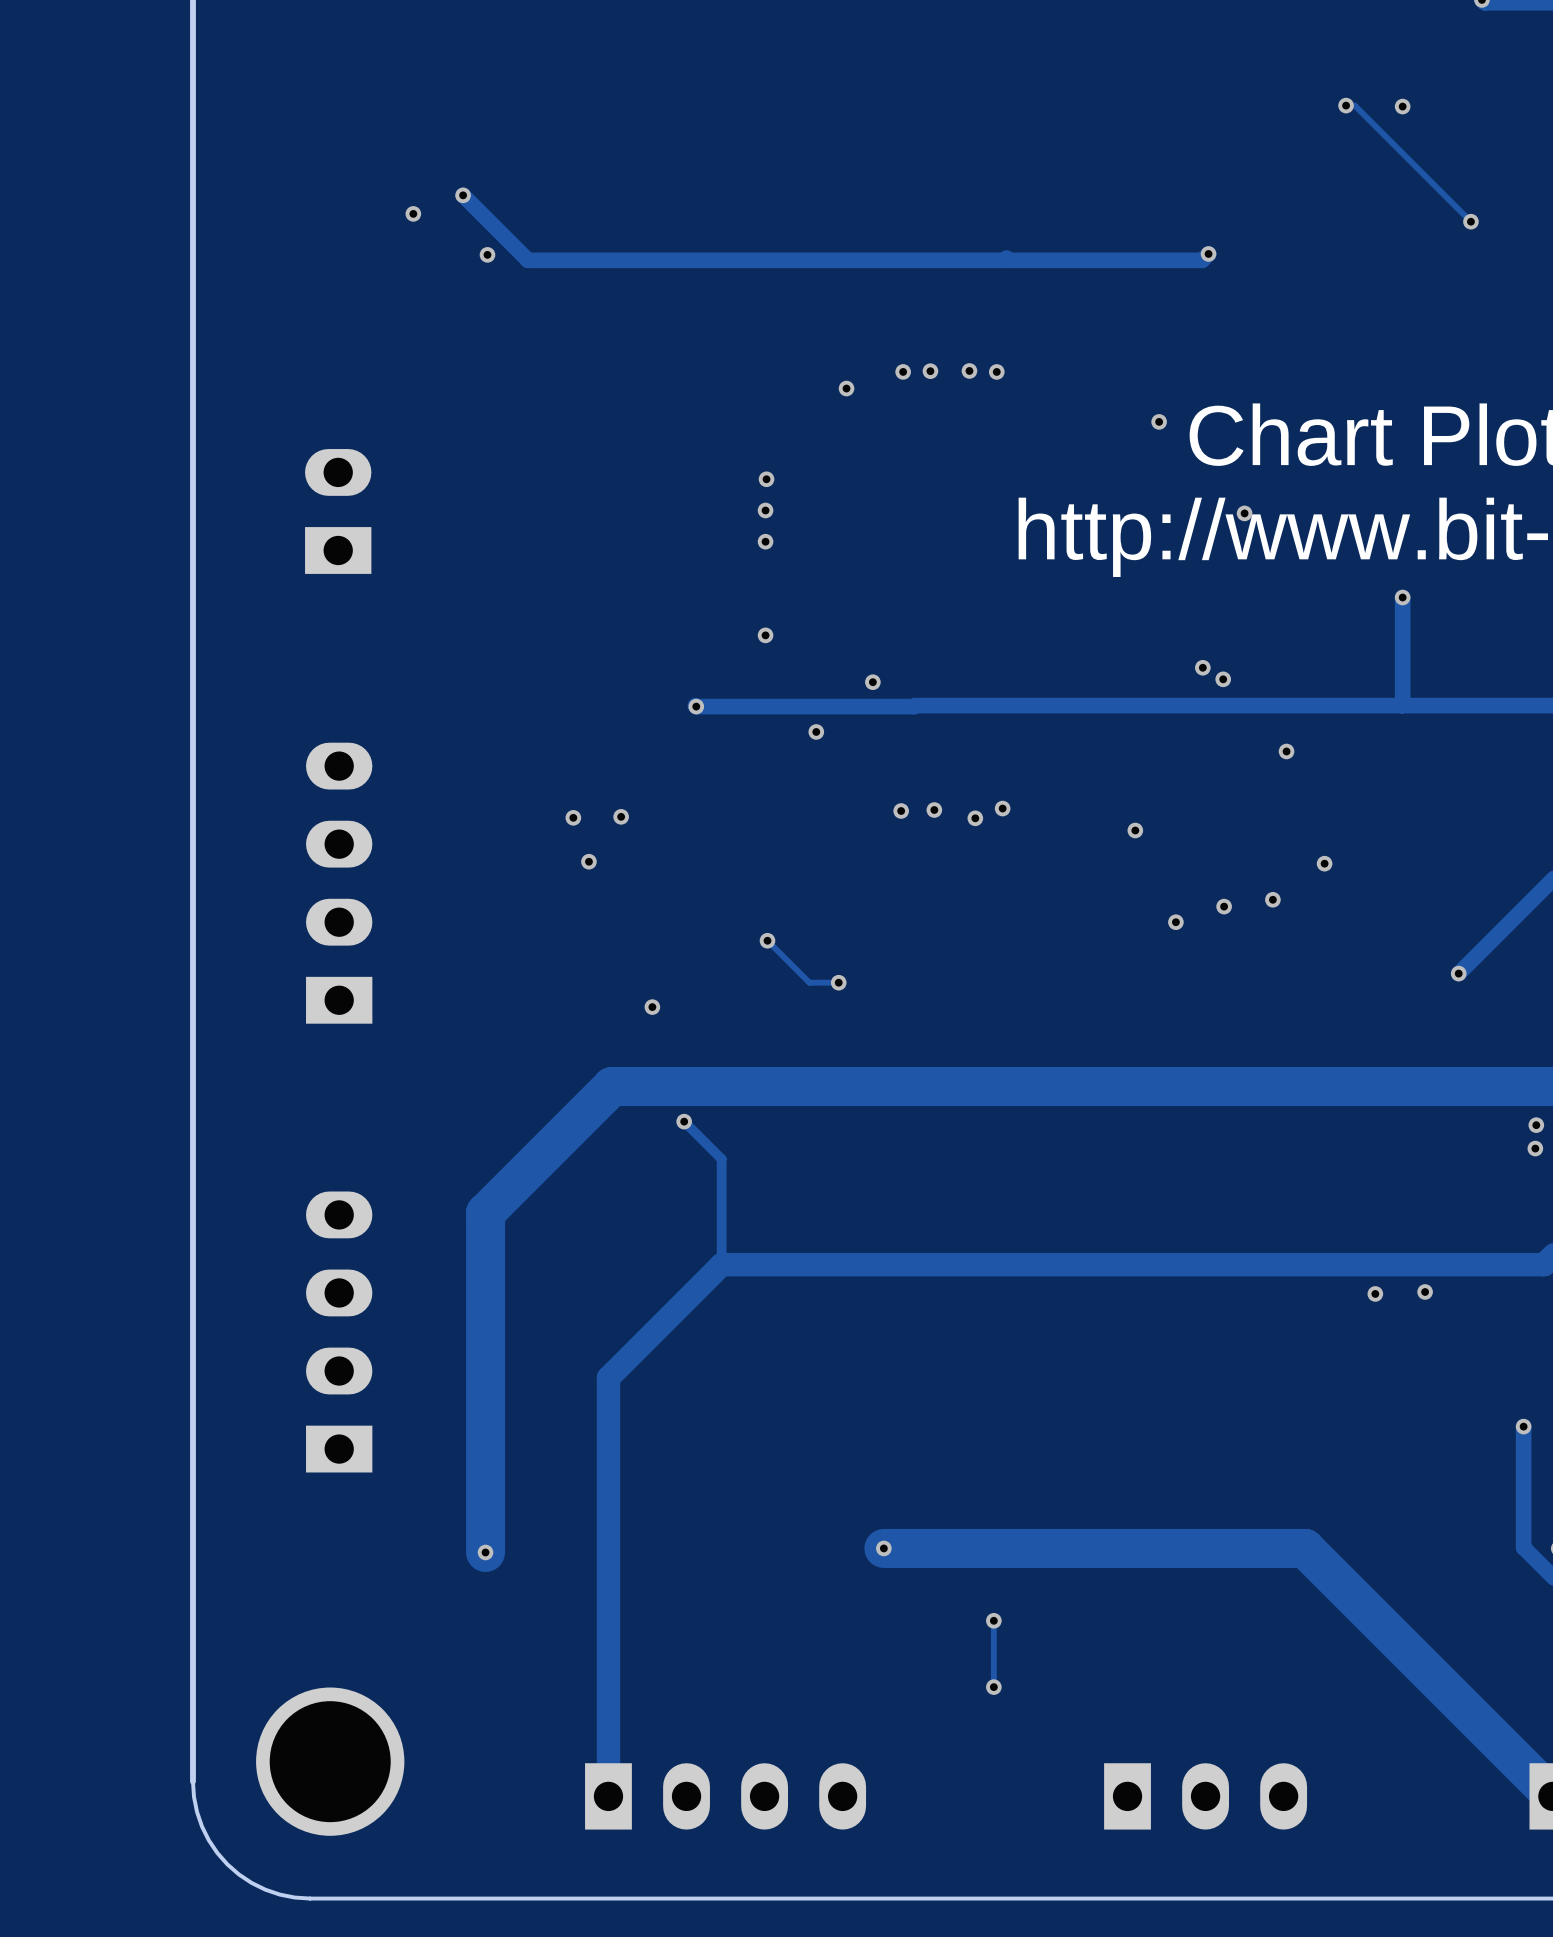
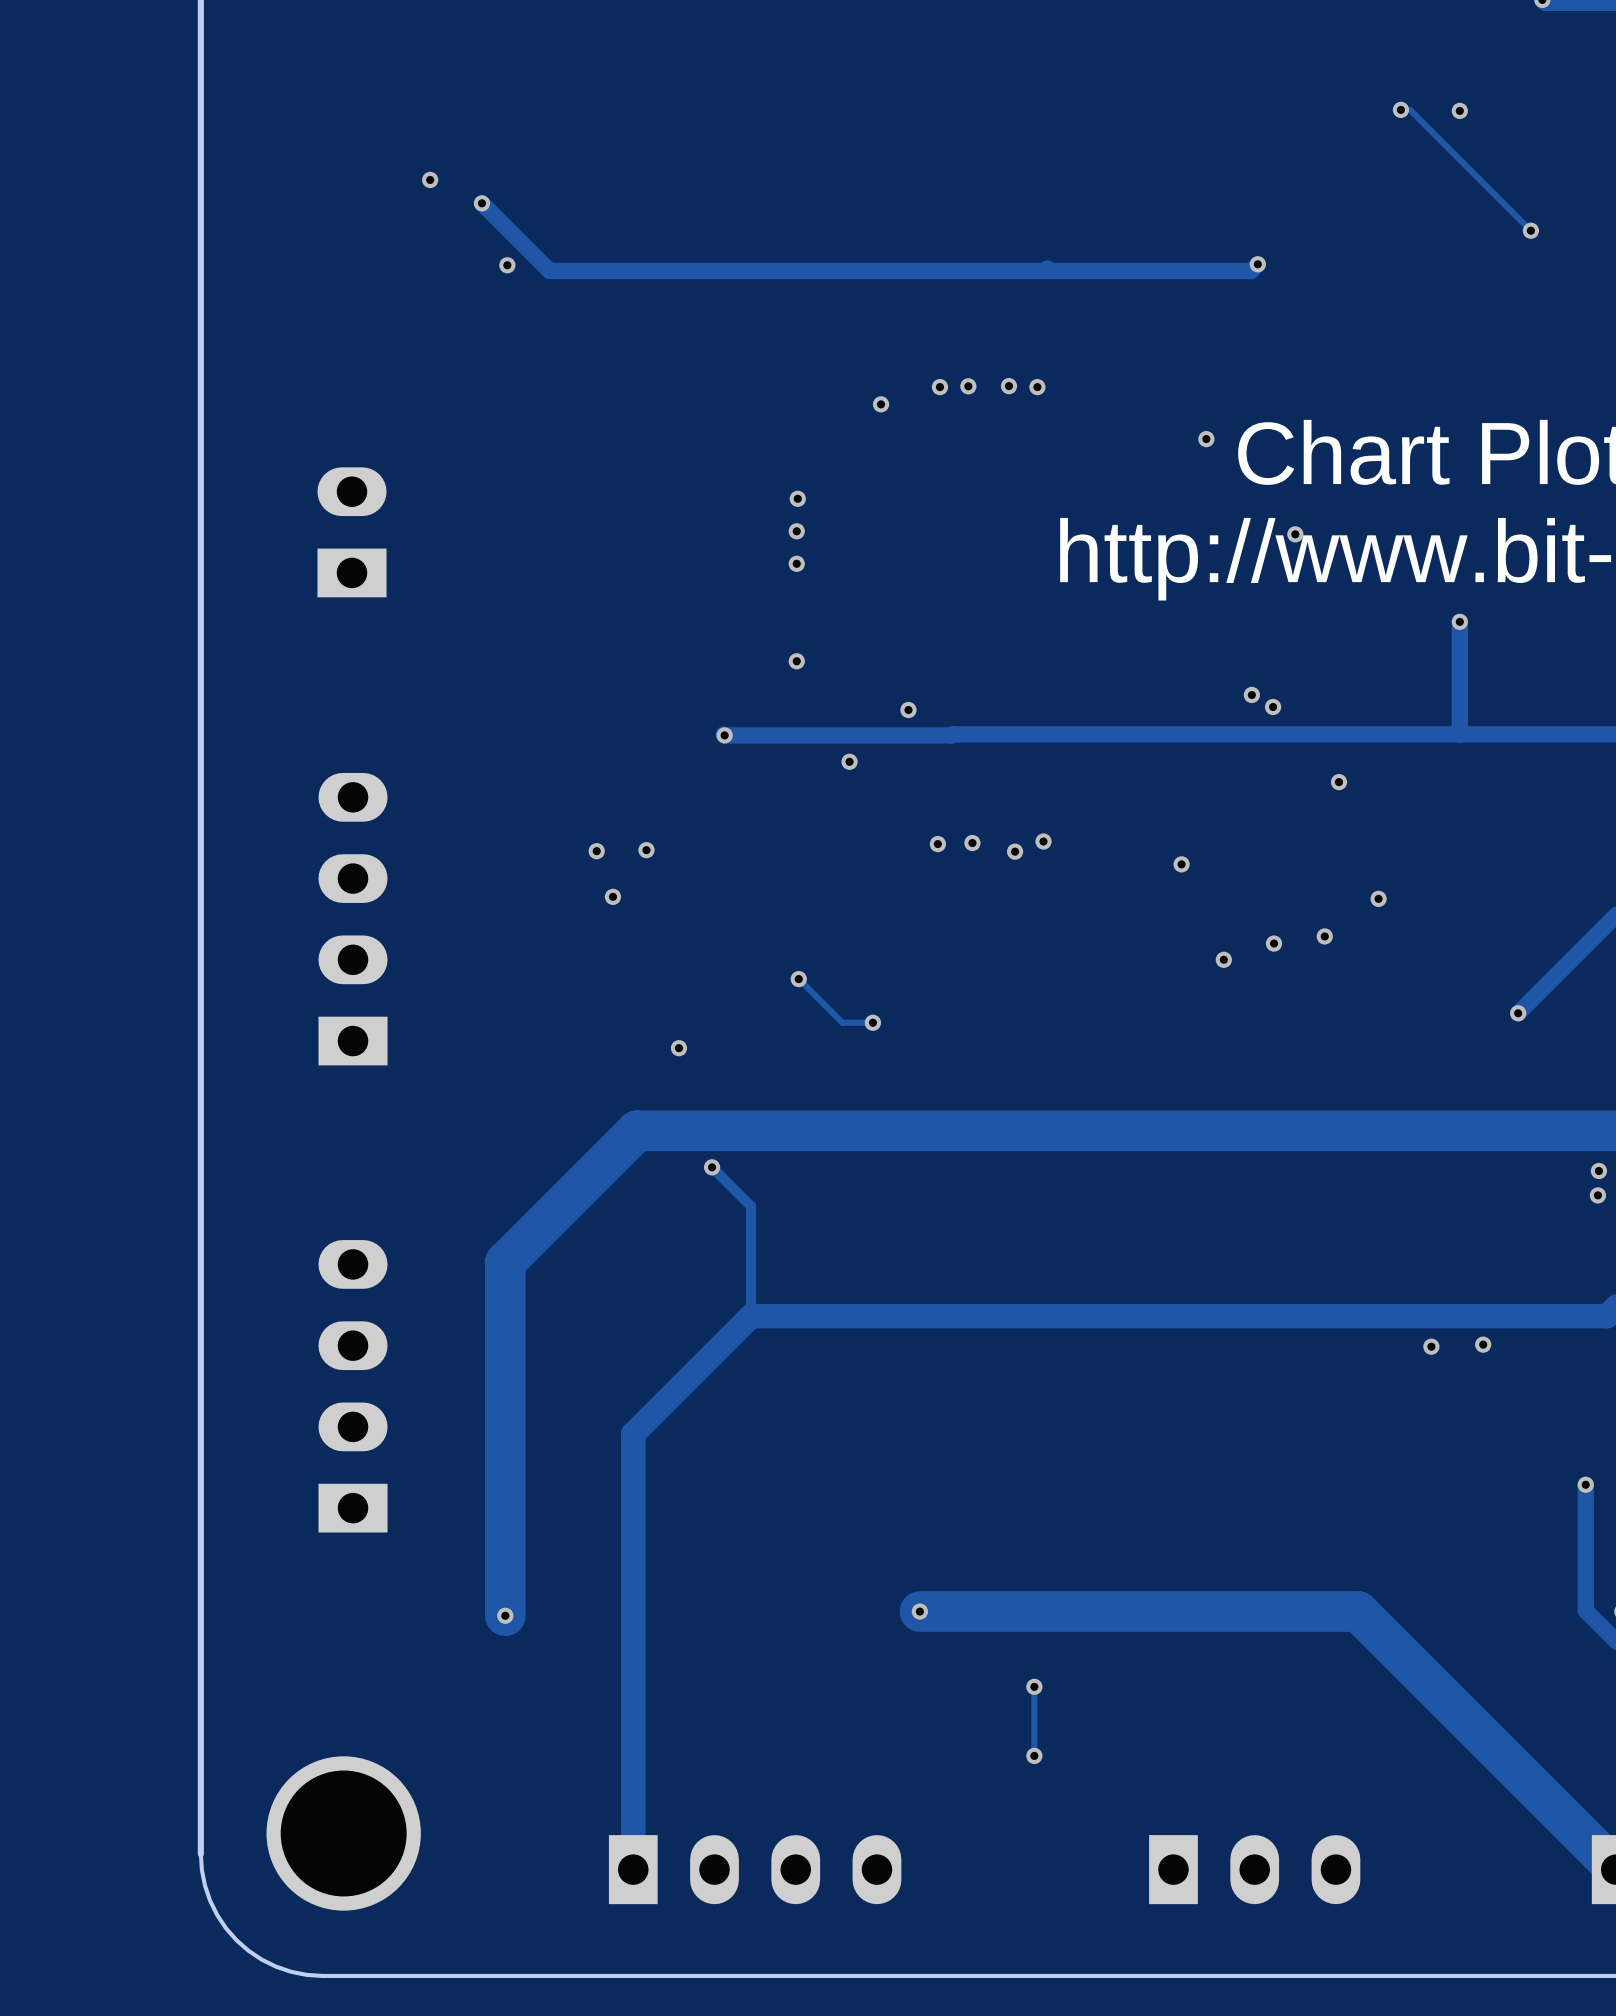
via position: (413, 213) -> (430, 179)

